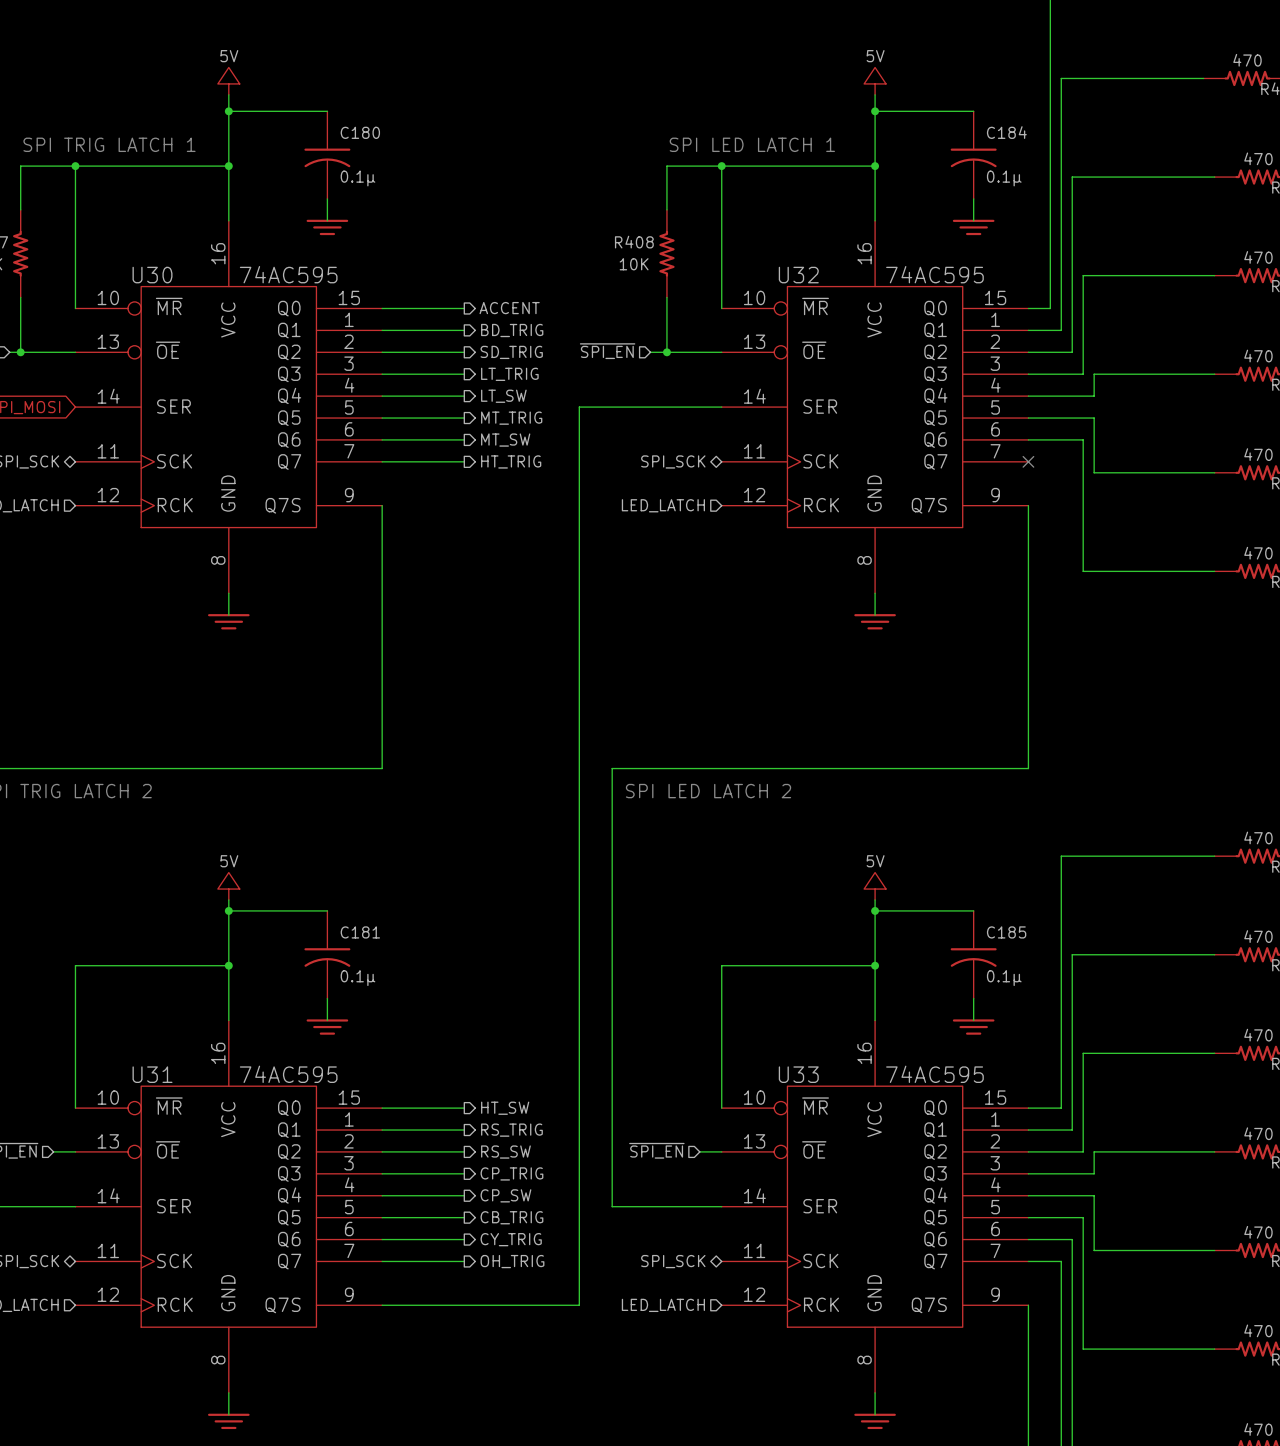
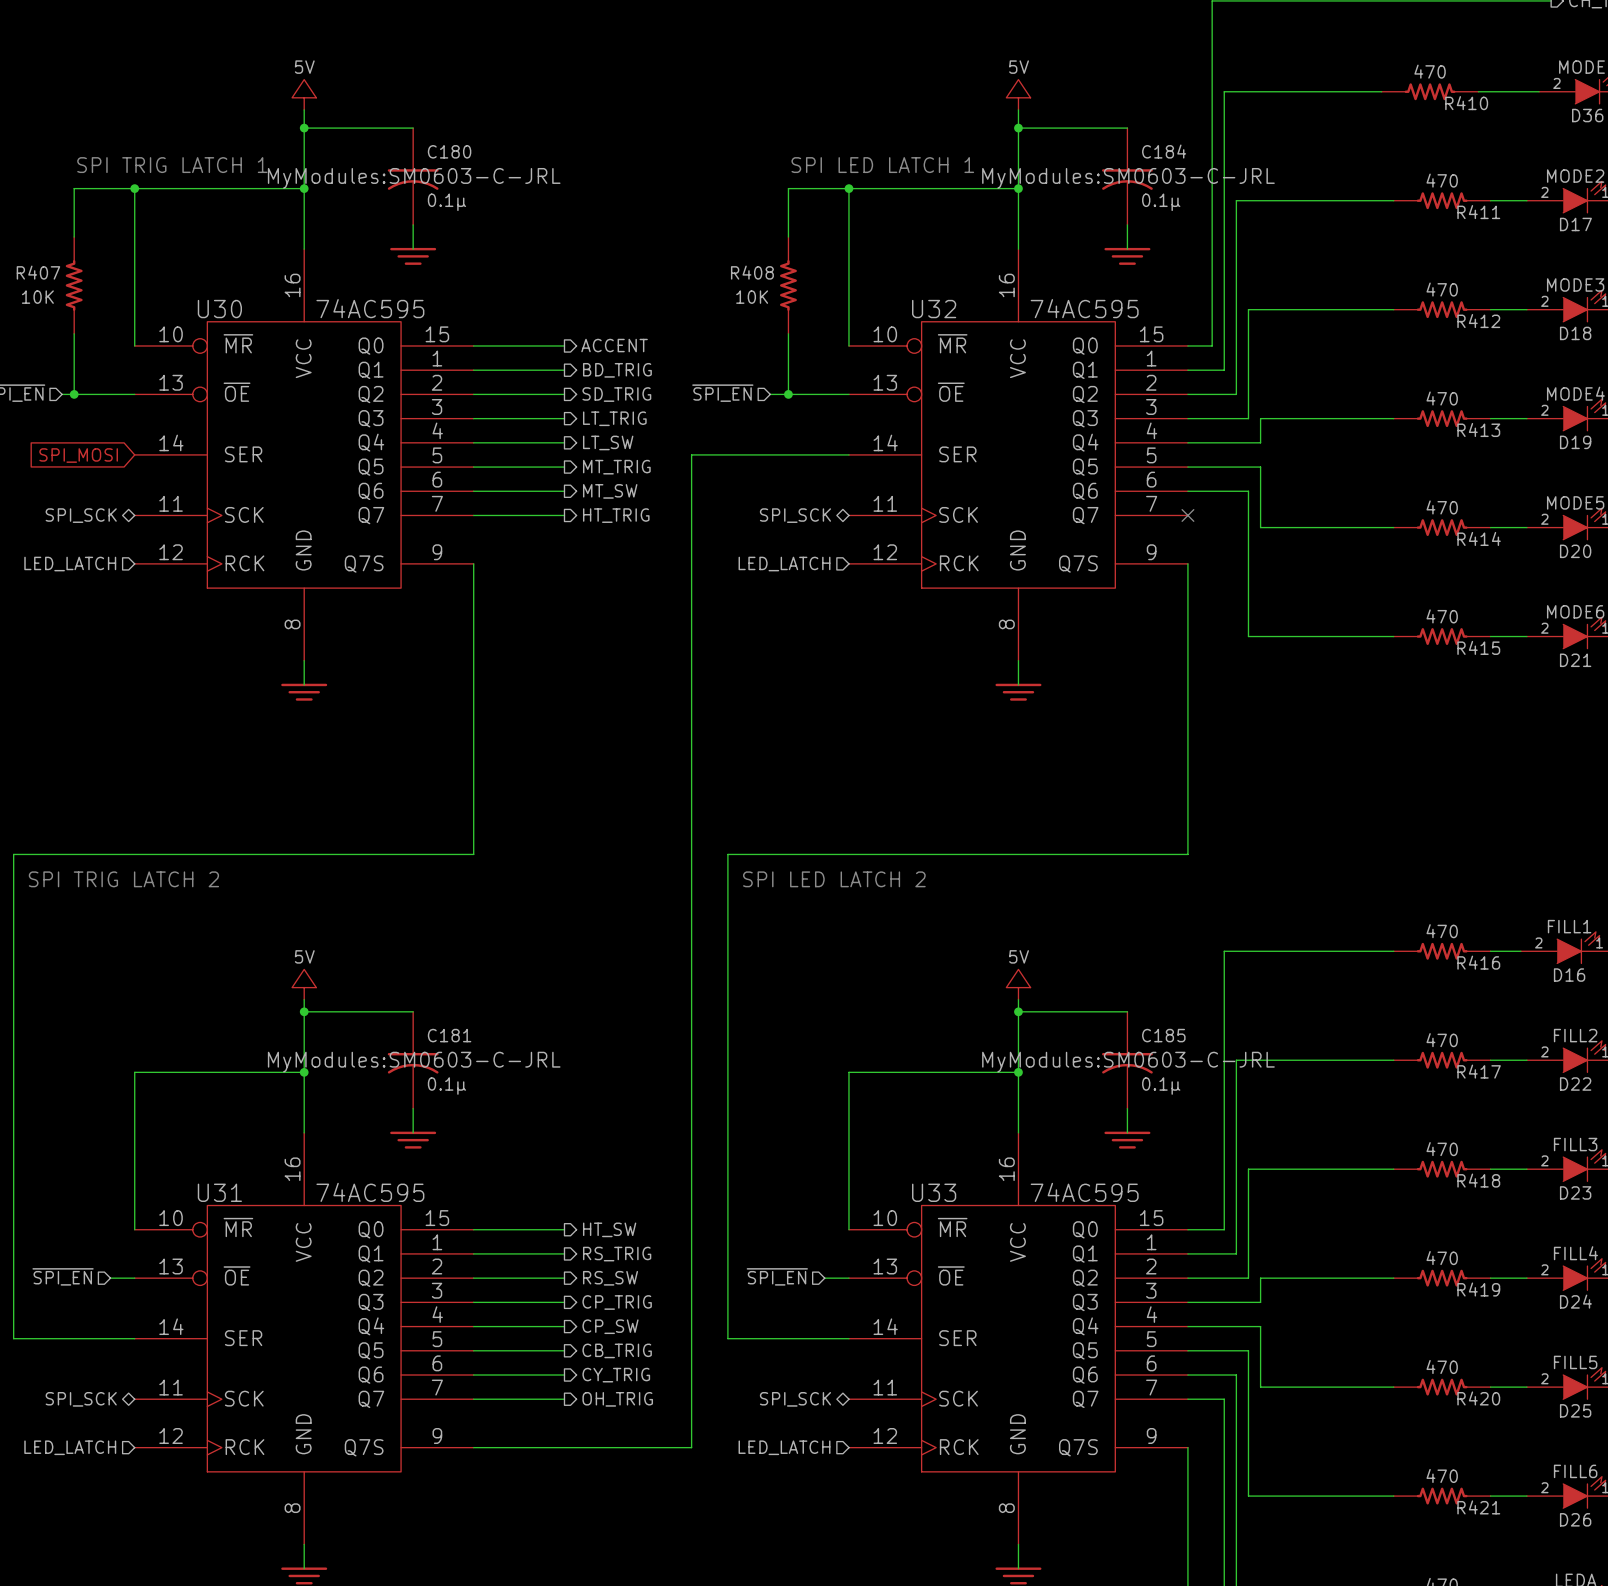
C180 text: none -> MyModules:SM0603-C-JRL (414, 178)
C184 text: none -> MyModules:SM0603-C-JRL (1128, 178)
C181 text: none -> MyModules:SM0603-C-JRL (414, 1062)
C185 text: none -> MyModules:SM0603-C-JRL (1128, 1062)

